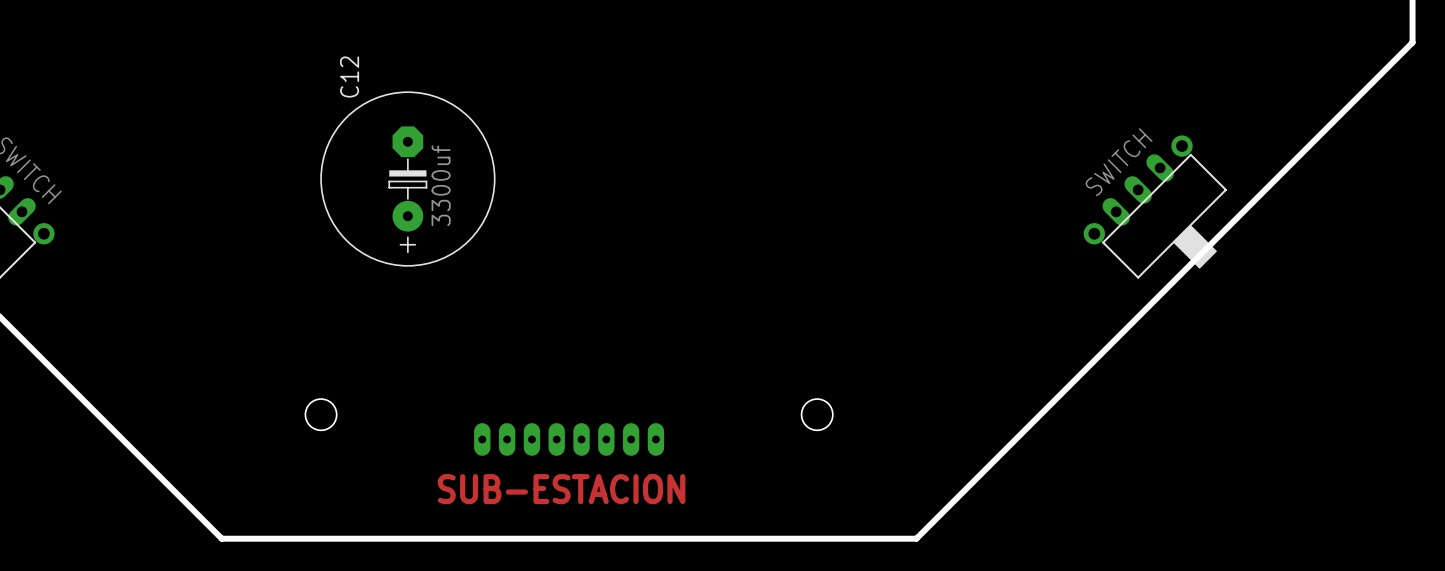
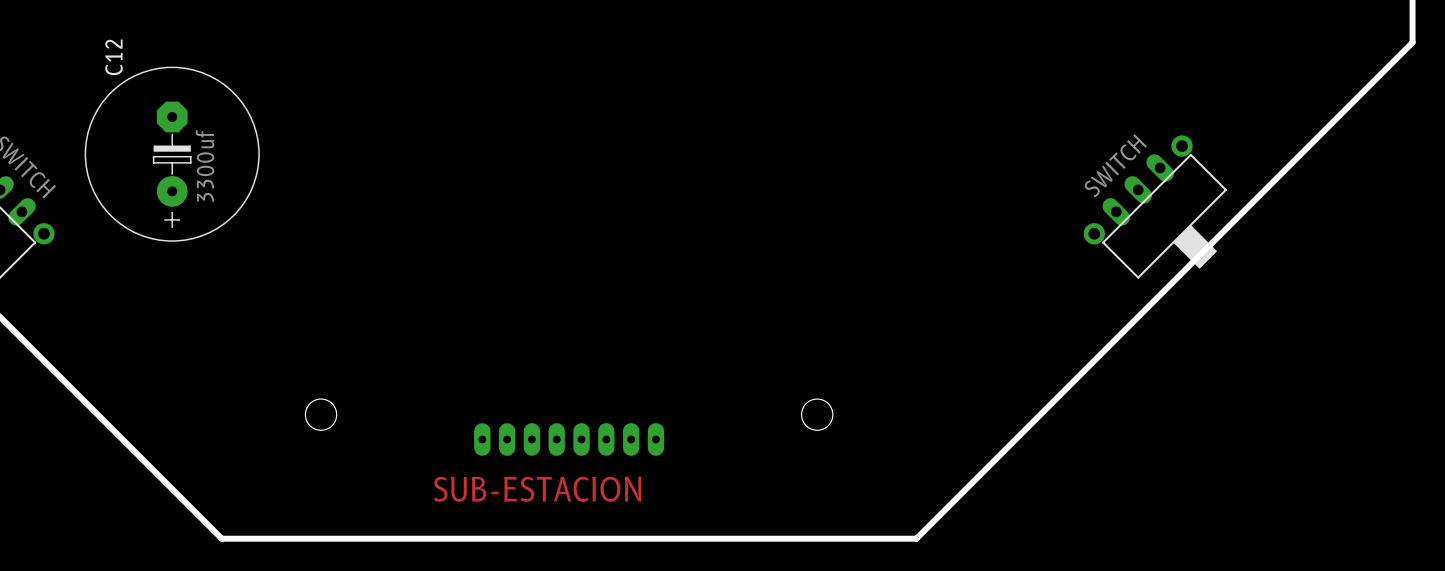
C12 position: (407, 179) -> (172, 154)

